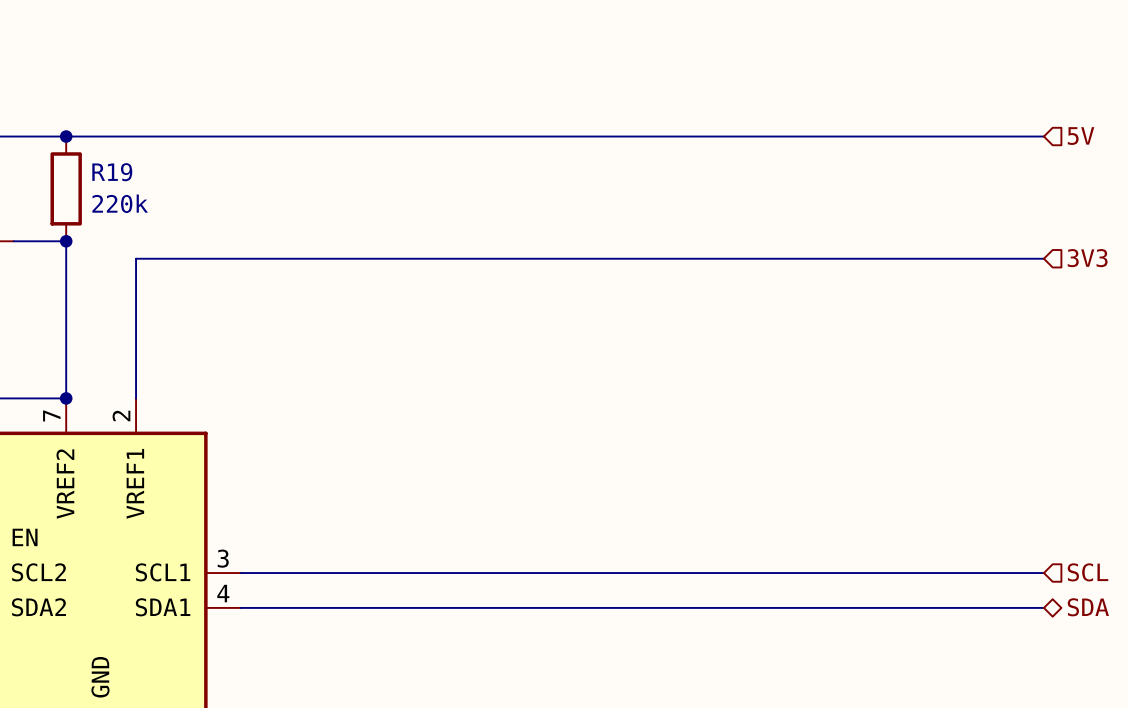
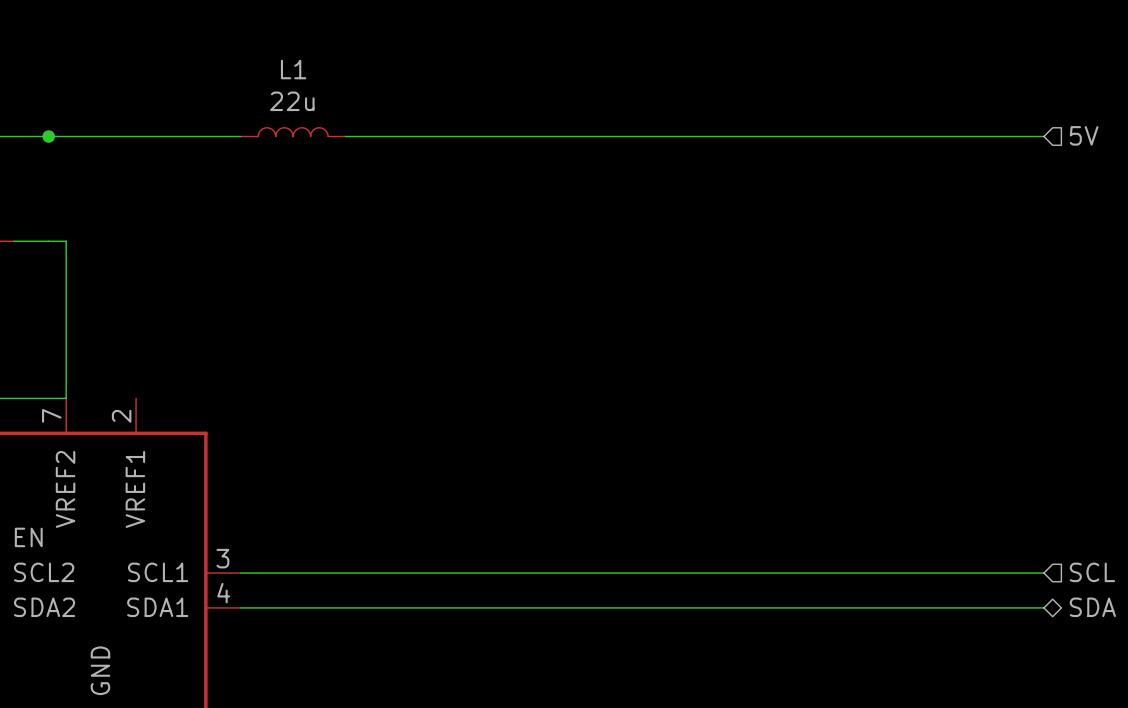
L1: none -> 22u (293, 132)
junction position: (66, 136) -> (48, 136)
wire: (240, 136) (345, 136) -> none
R19: 220k (66, 188) -> none
junction: (66, 241) -> none
wire: (1043, 258) (136, 258) (136, 398) -> none
hierarchical label: 3V3 (1087, 258) -> none
junction: (66, 398) -> none

